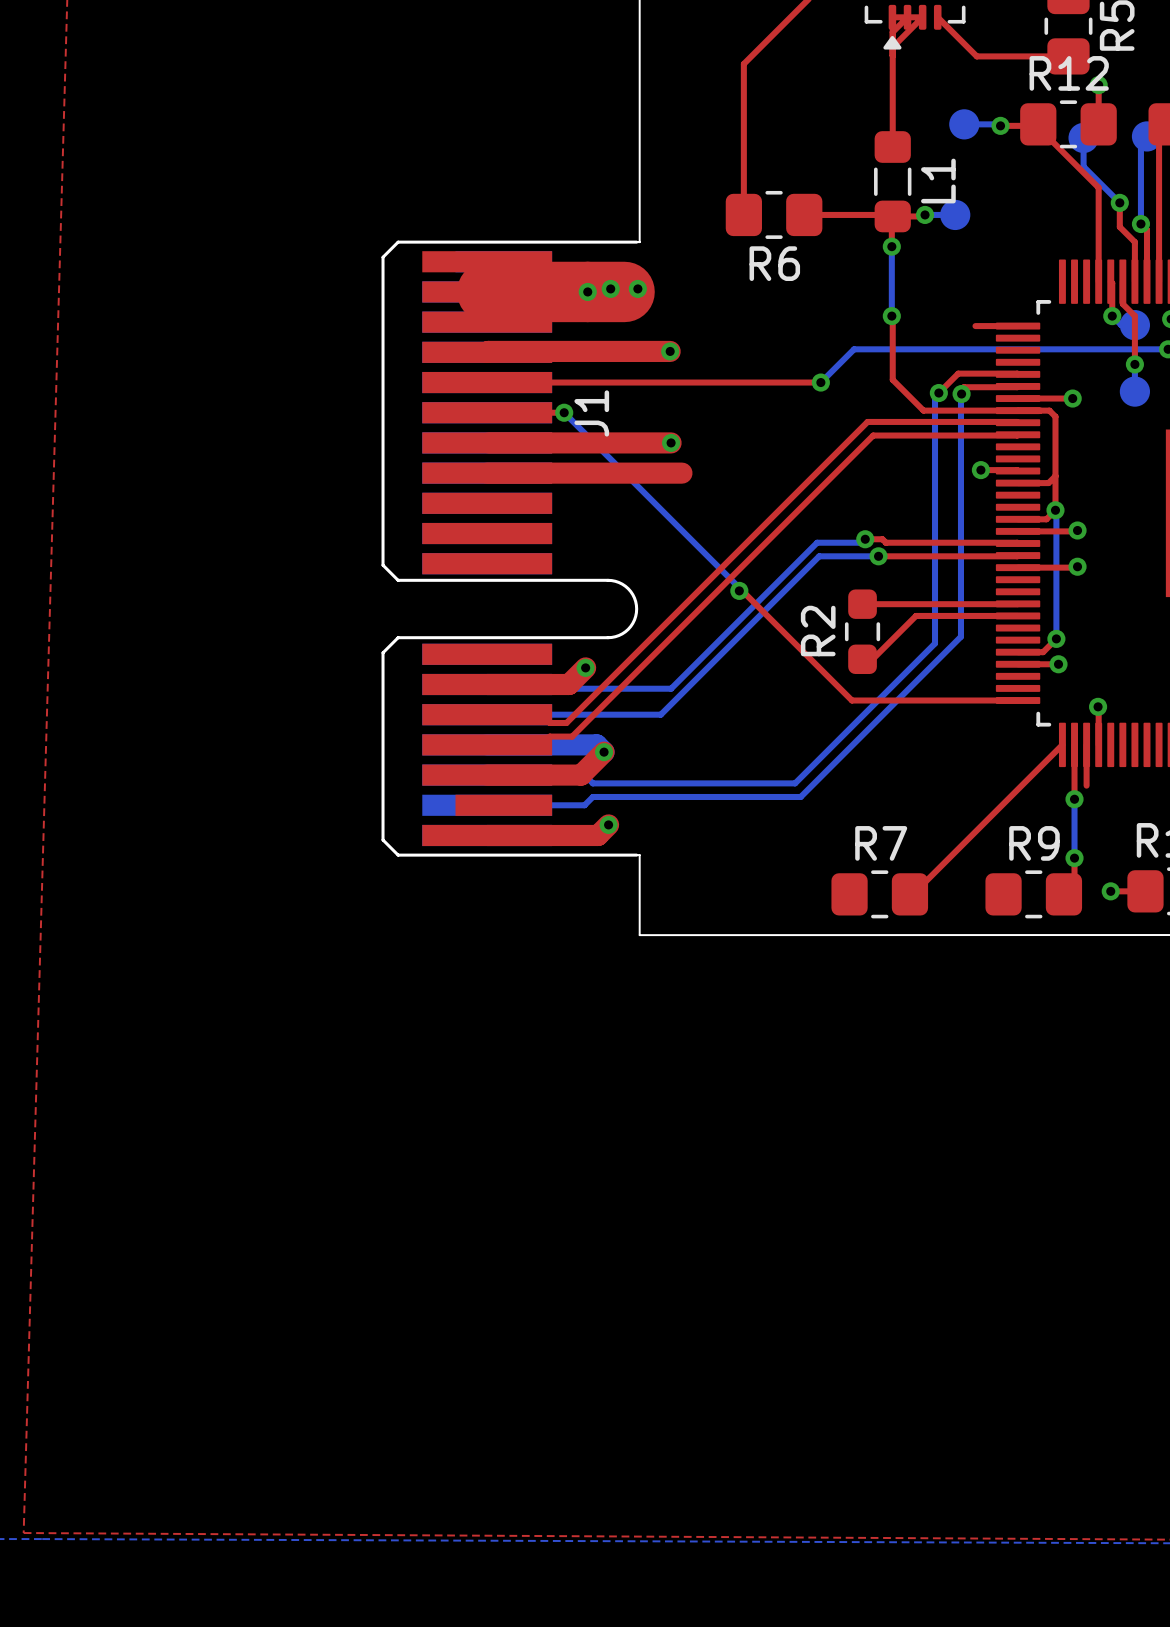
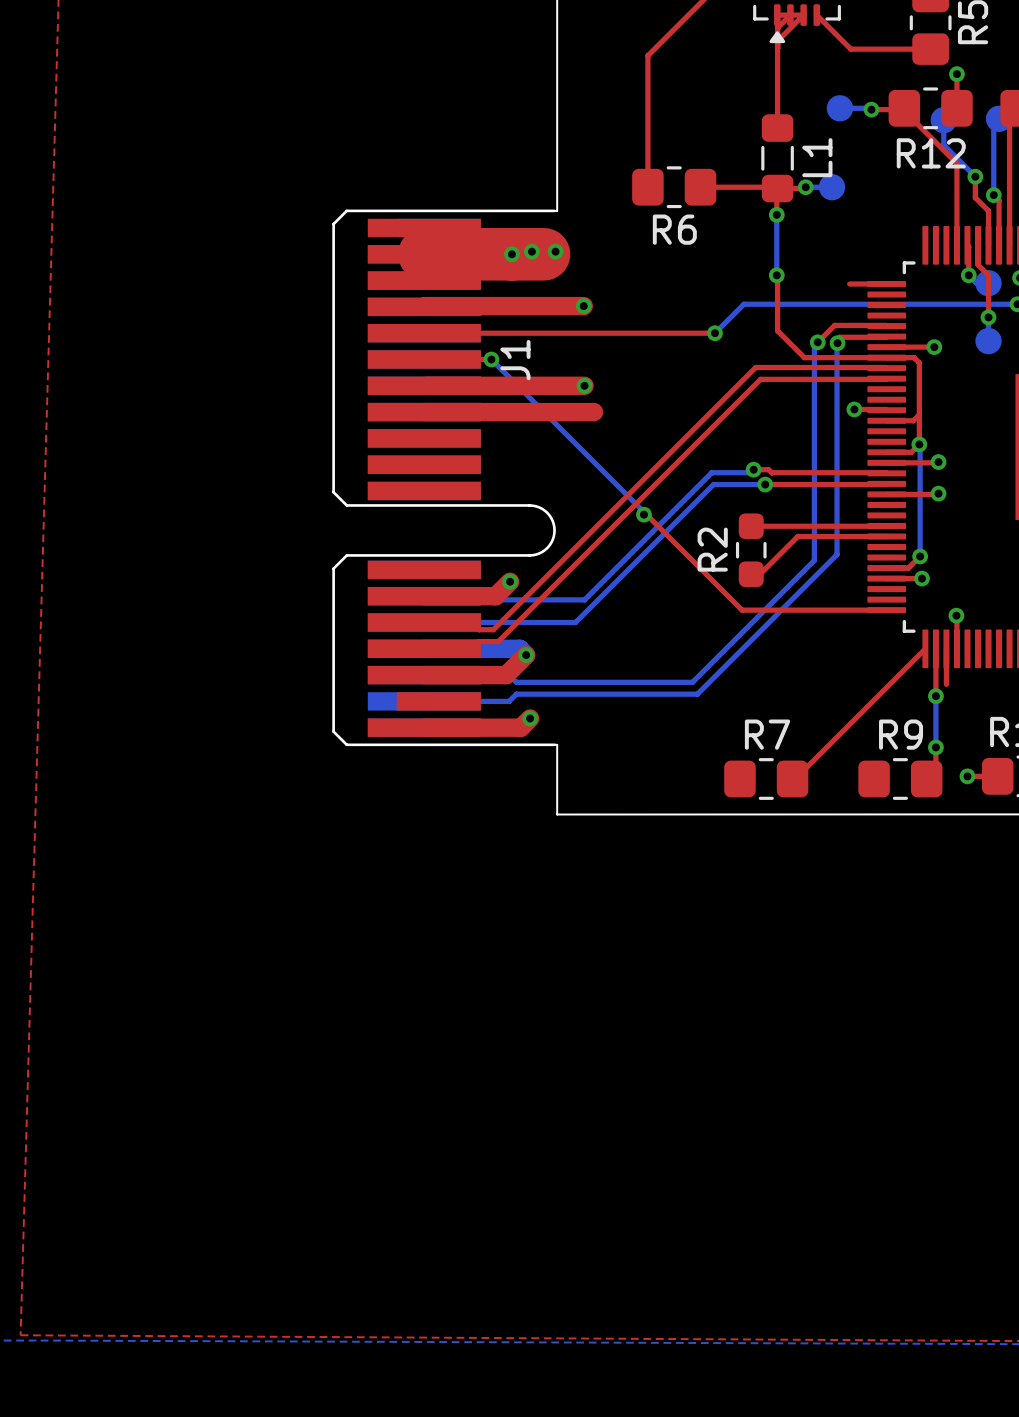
R12 name position: R12 (1069, 73) -> R12 (931, 153)

